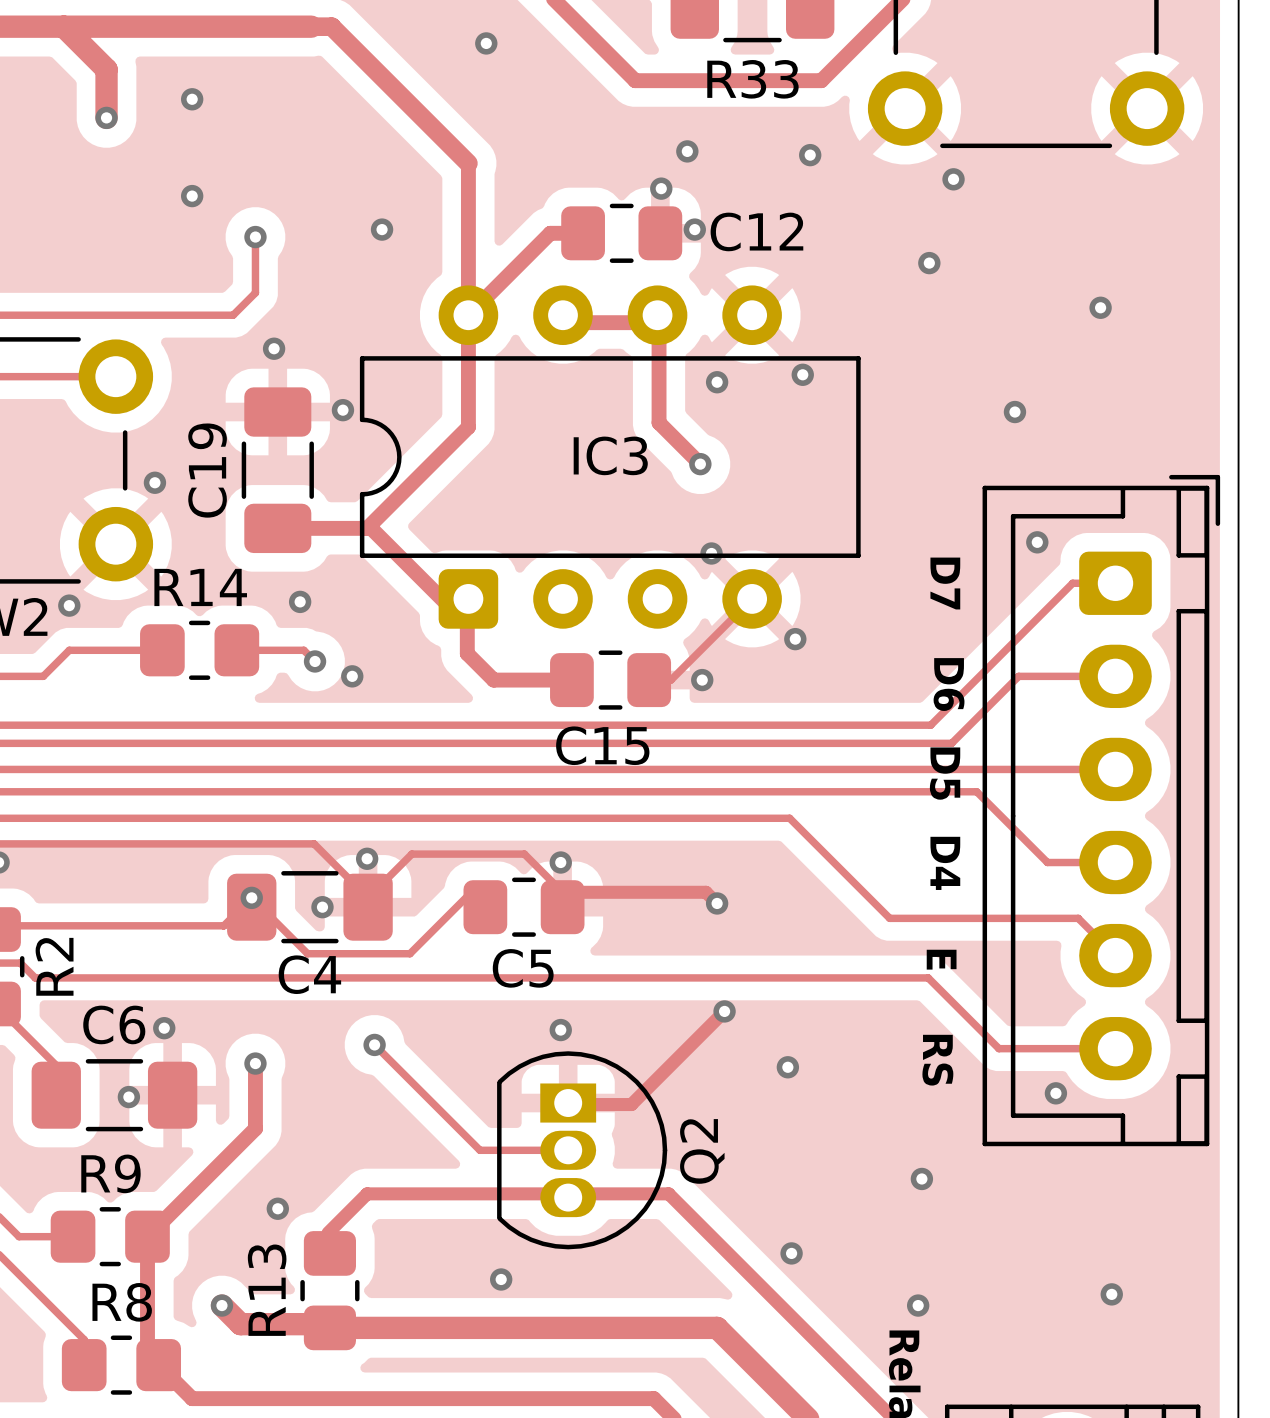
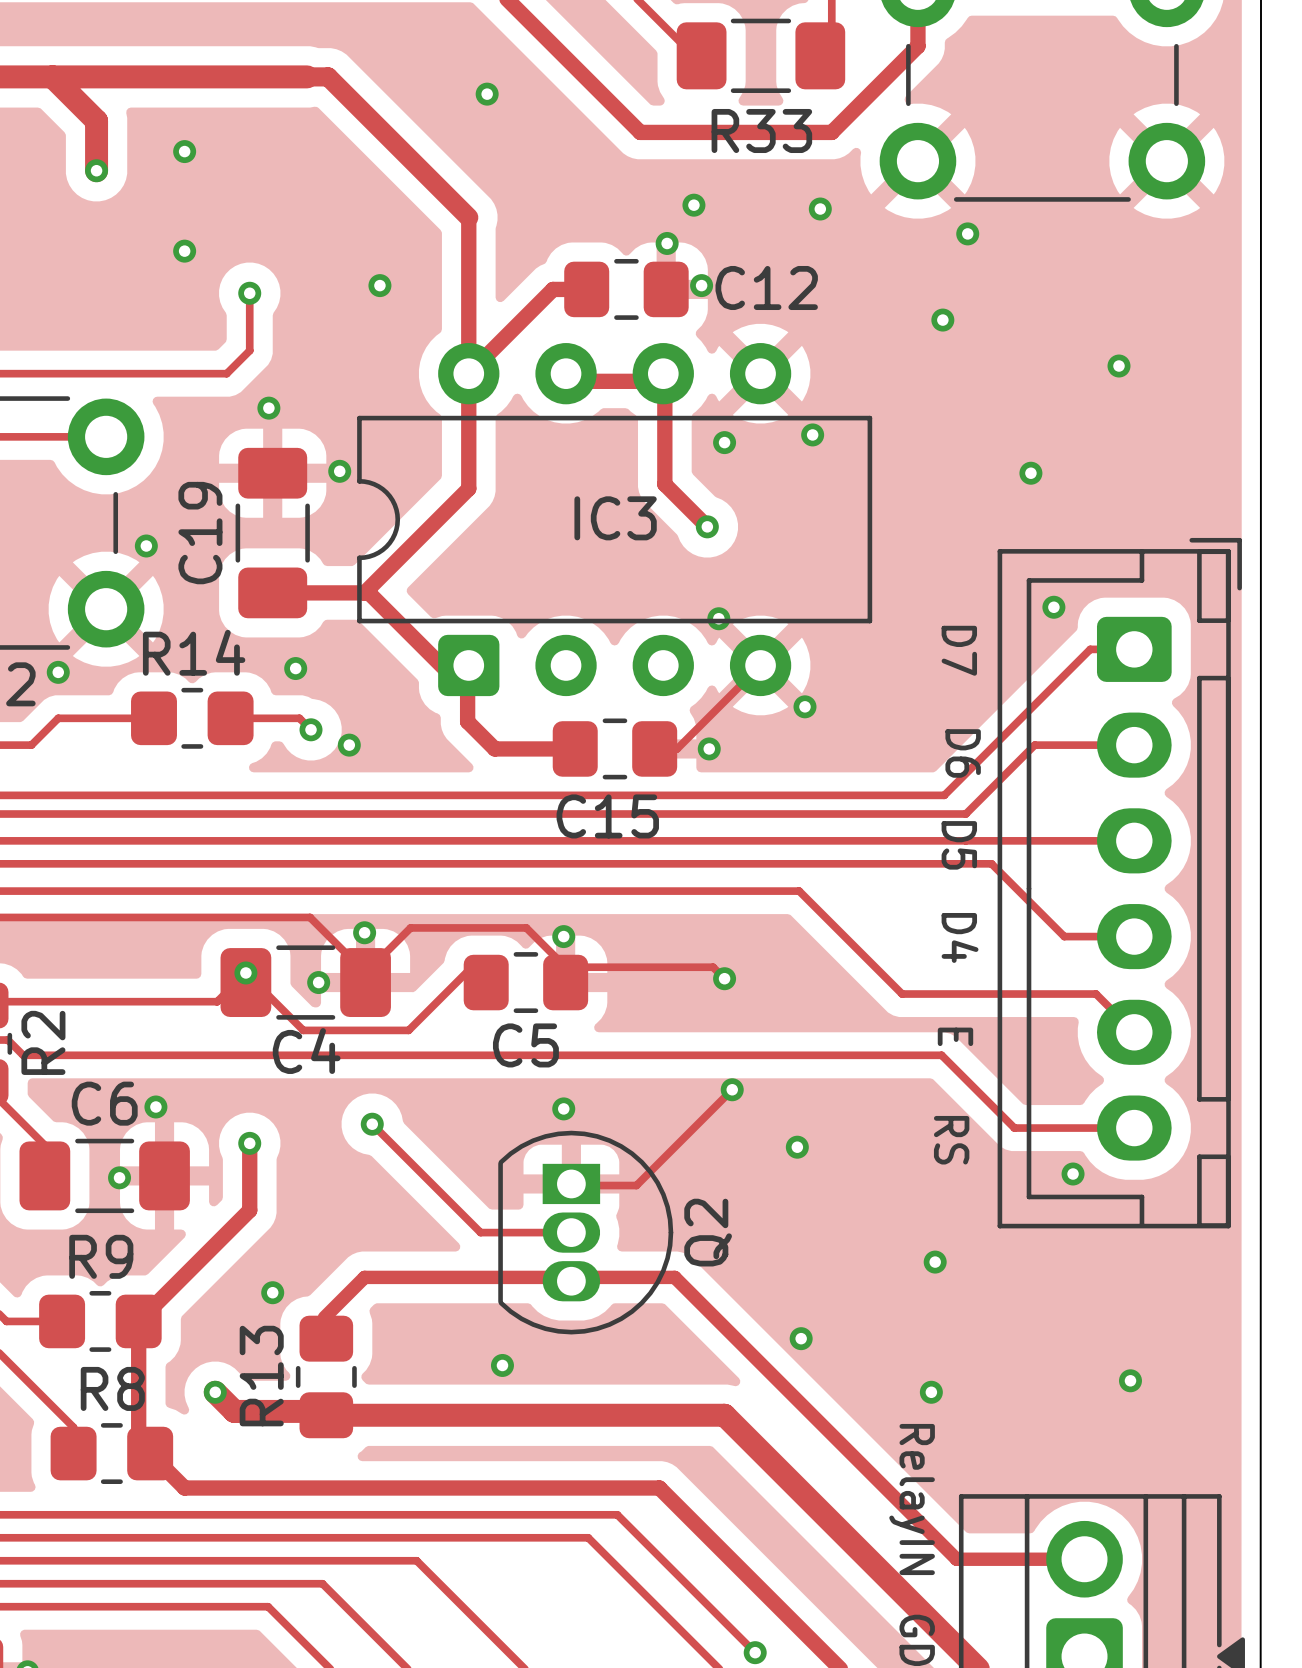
track width: thick (562, 892) (705, 892) (717, 903) -> thin (565, 967) (713, 967) (724, 978)
track width: thick (724, 1011) (631, 1104) (568, 1104) -> thin (732, 1089) (636, 1185) (571, 1185)

